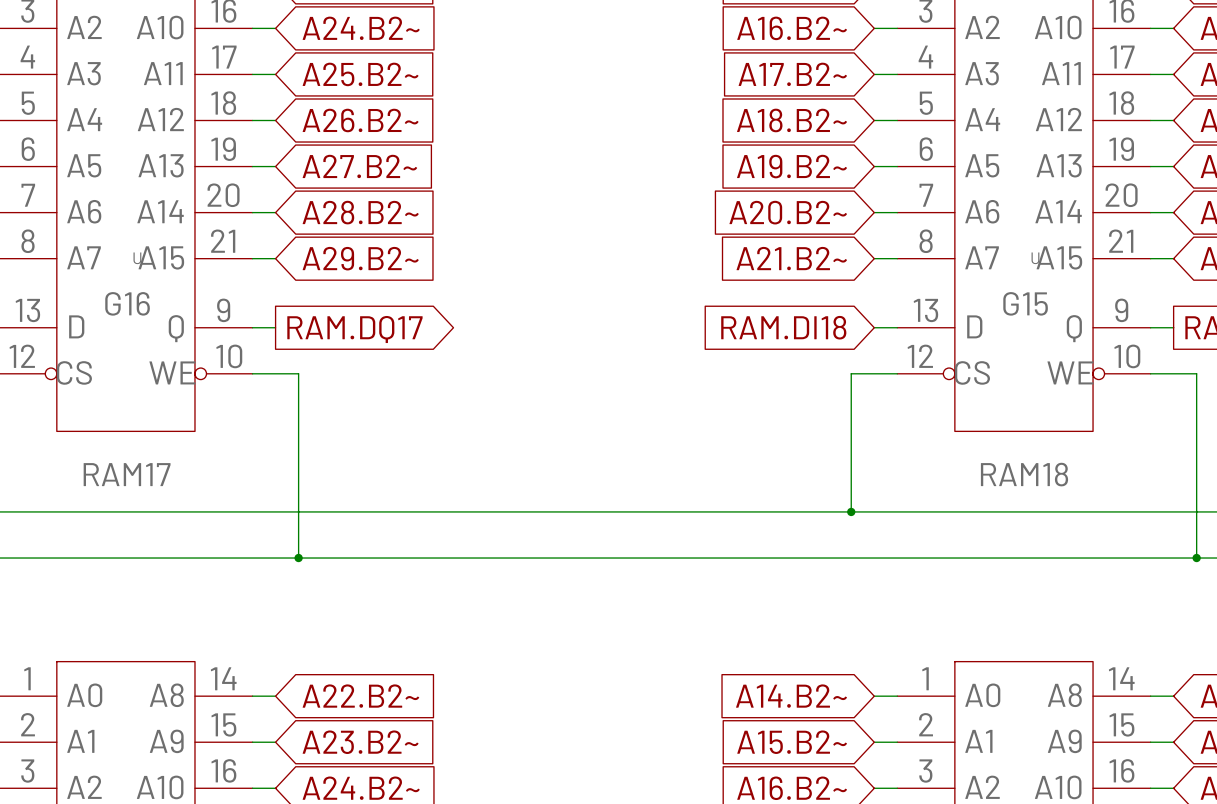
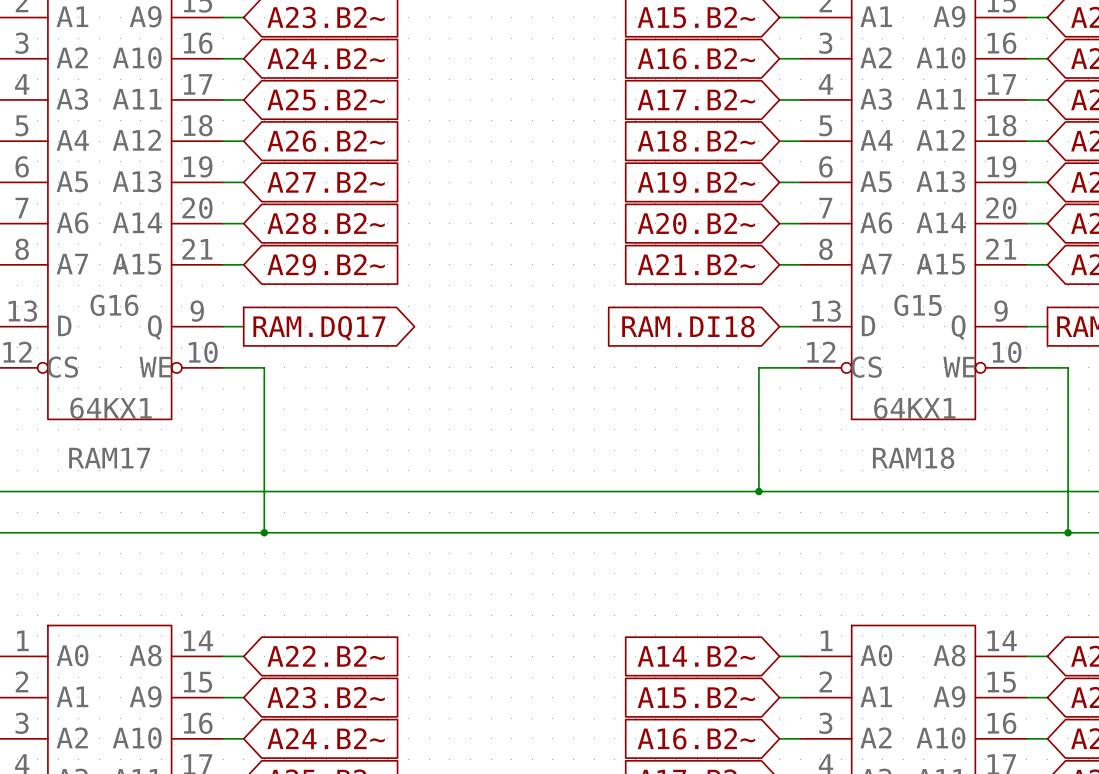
U value: none -> 64KX1 (111, 408)
U value: none -> 64KX1 (914, 408)

